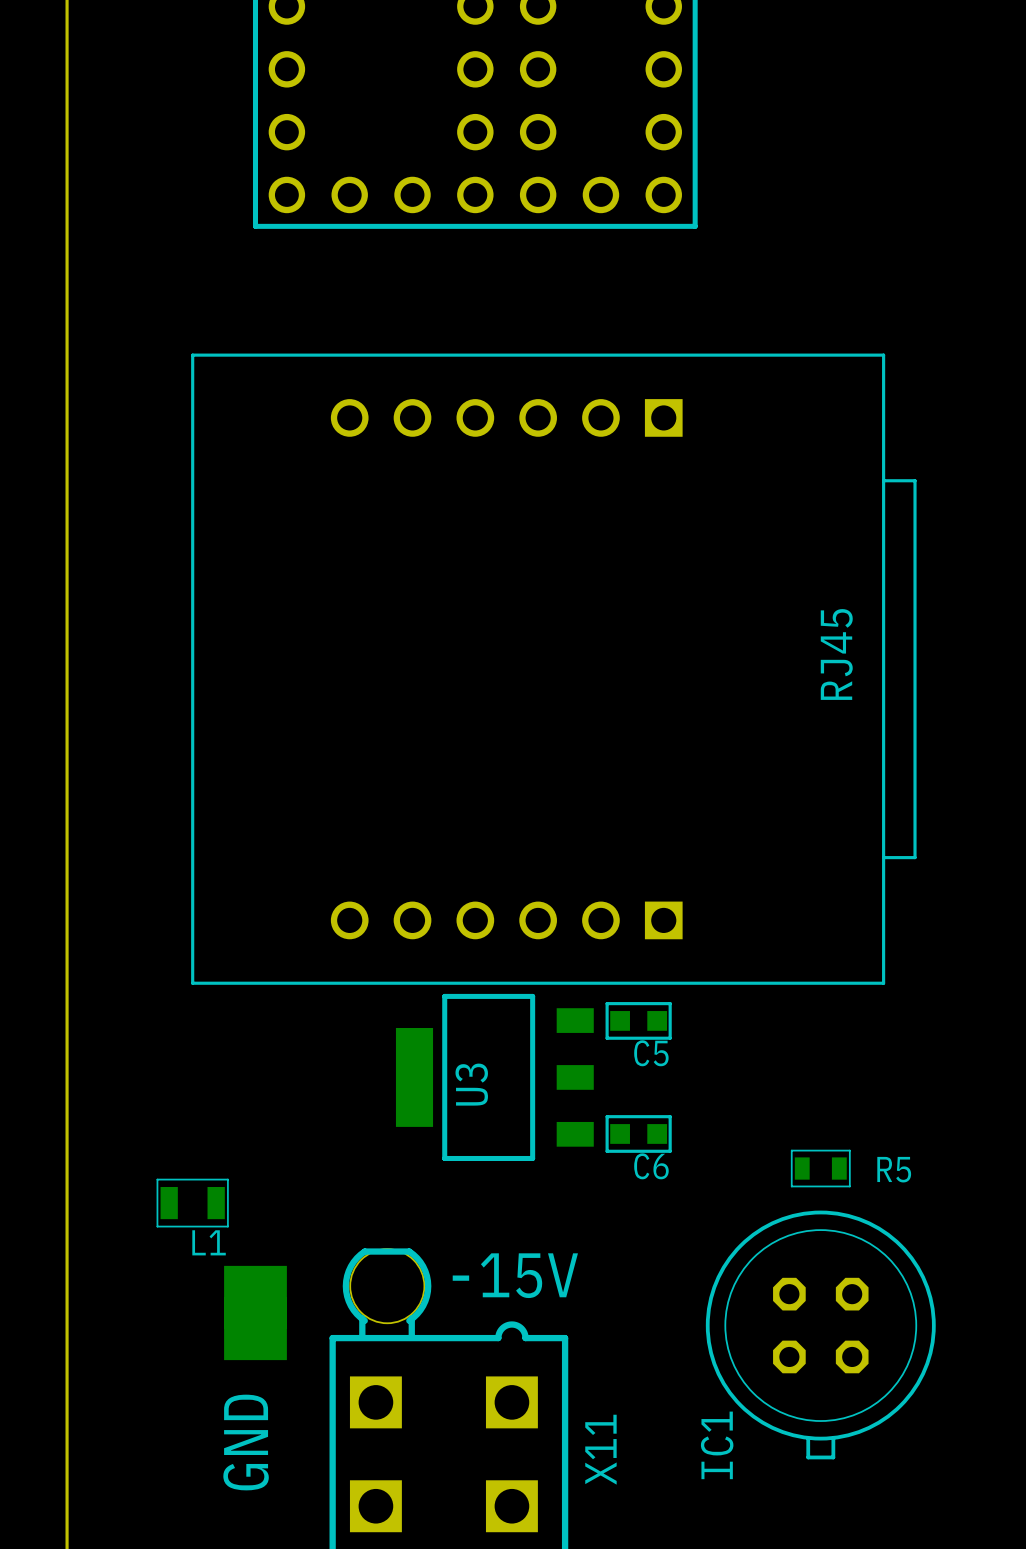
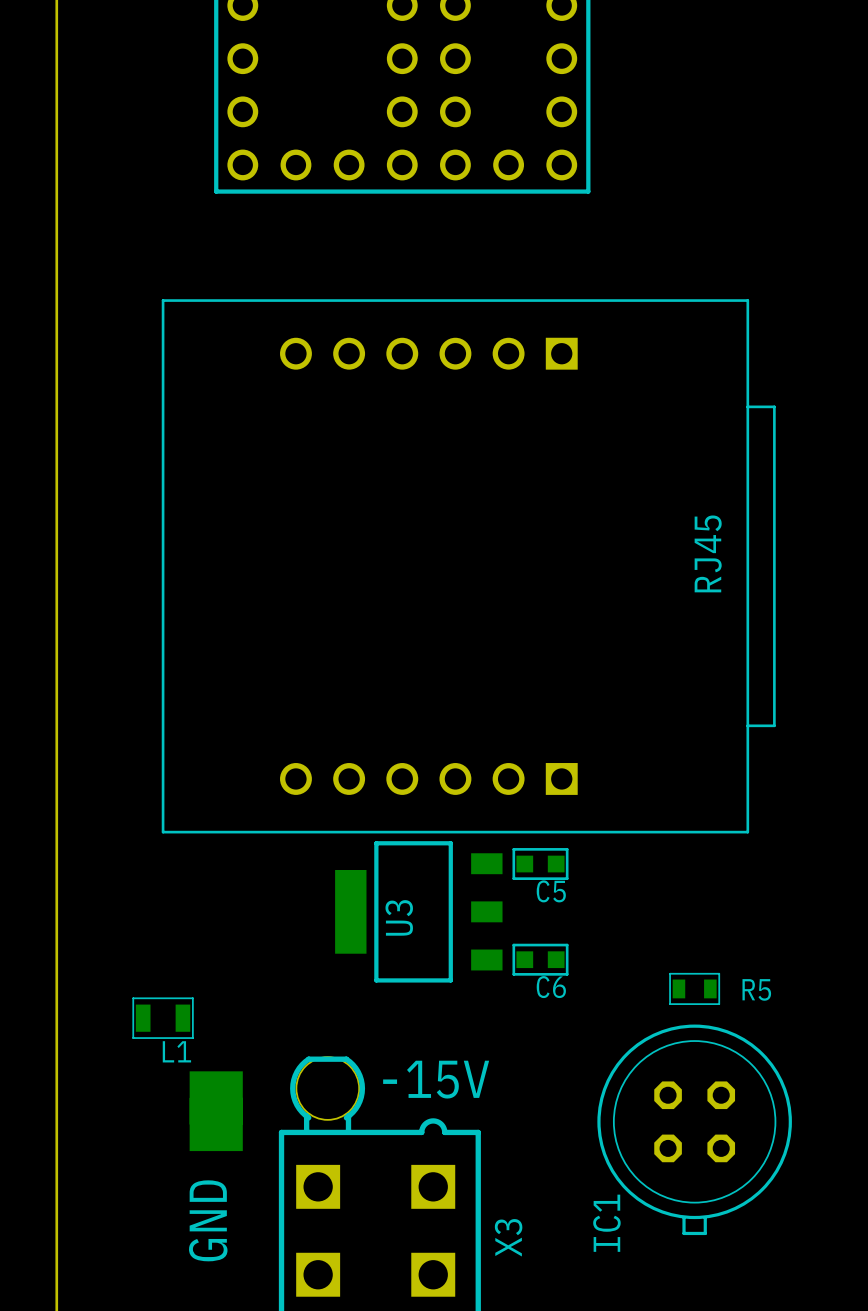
X11 name: X11 (600, 1449) -> X3 (508, 1237)

